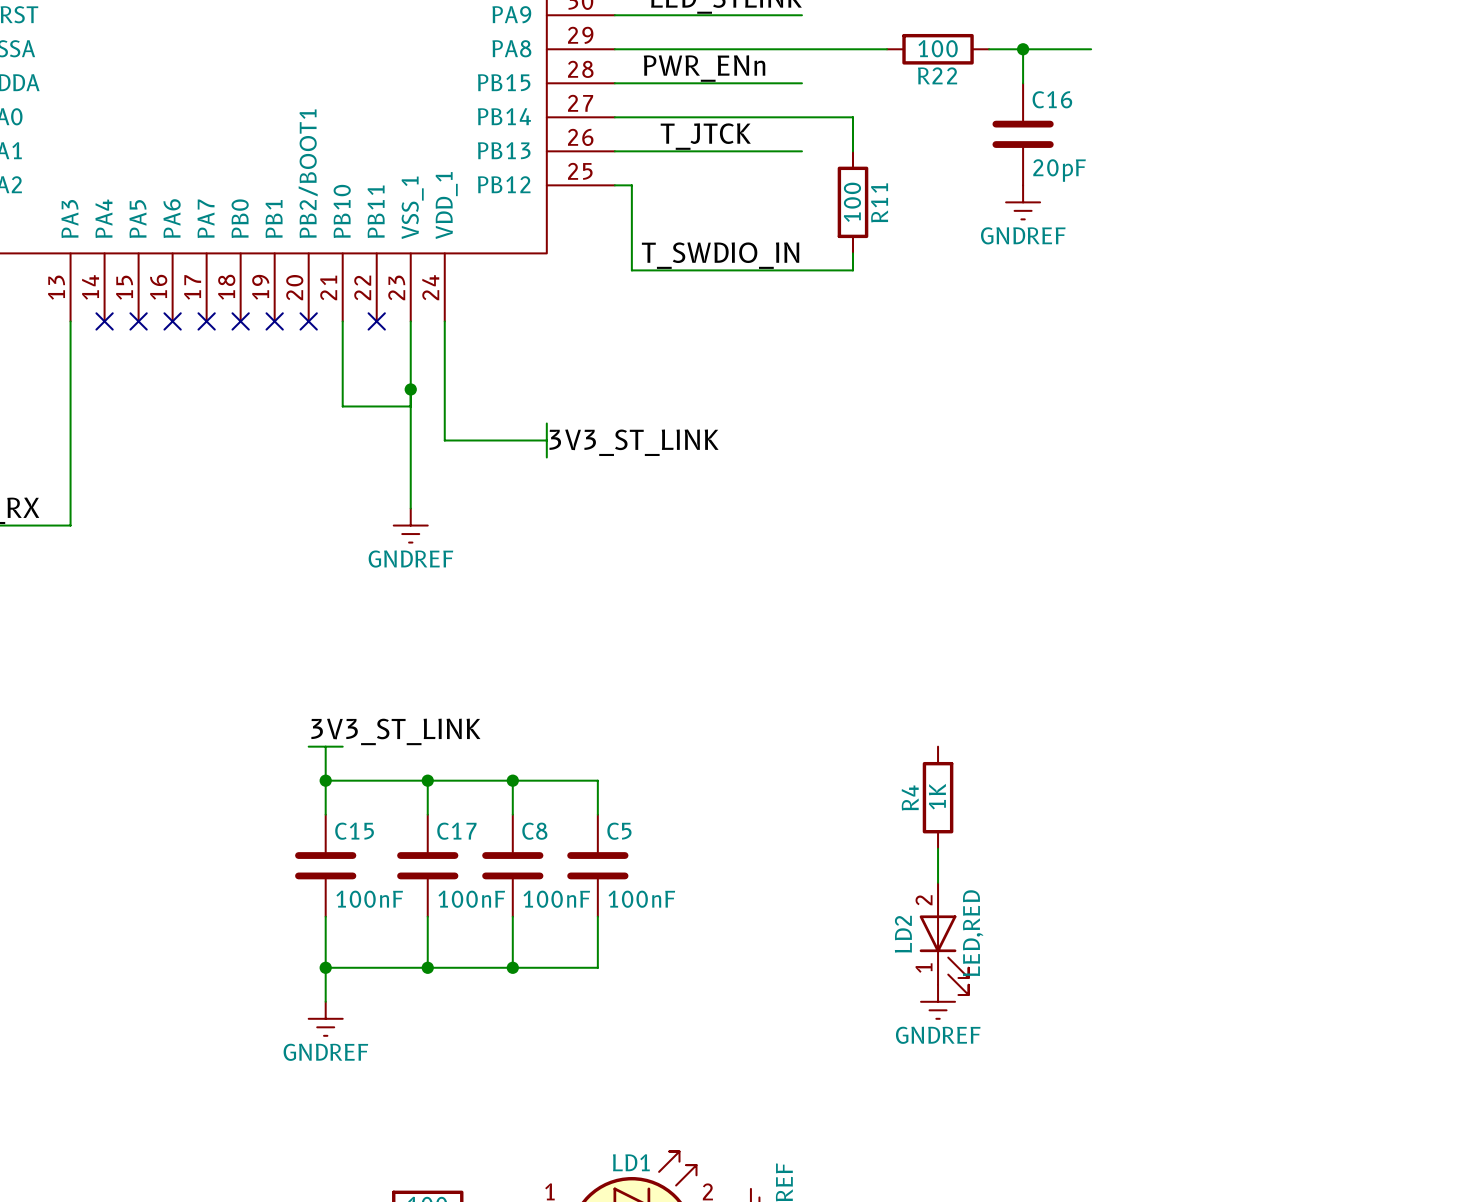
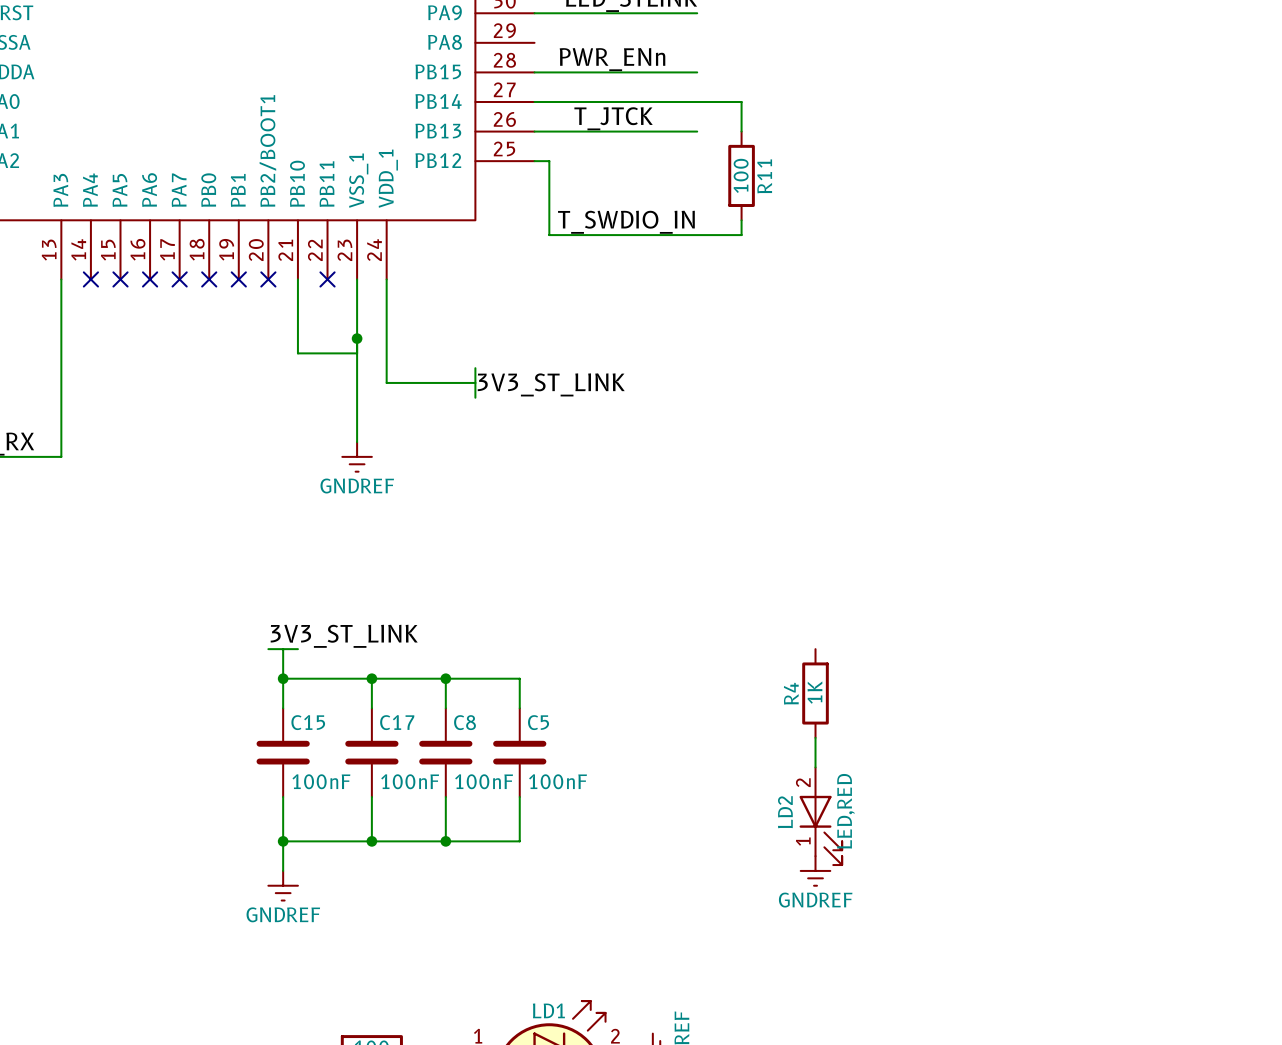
wire: (614, 49) (887, 49) -> none
R22: 100 (938, 49) -> none
wire: (989, 49) (1091, 49) -> none
wire: (1023, 49) (1023, 83) -> none
junction: (1023, 49) -> none
C16: 20pF (1023, 134) -> none
power symbol: GNDREF (1023, 202) -> none

